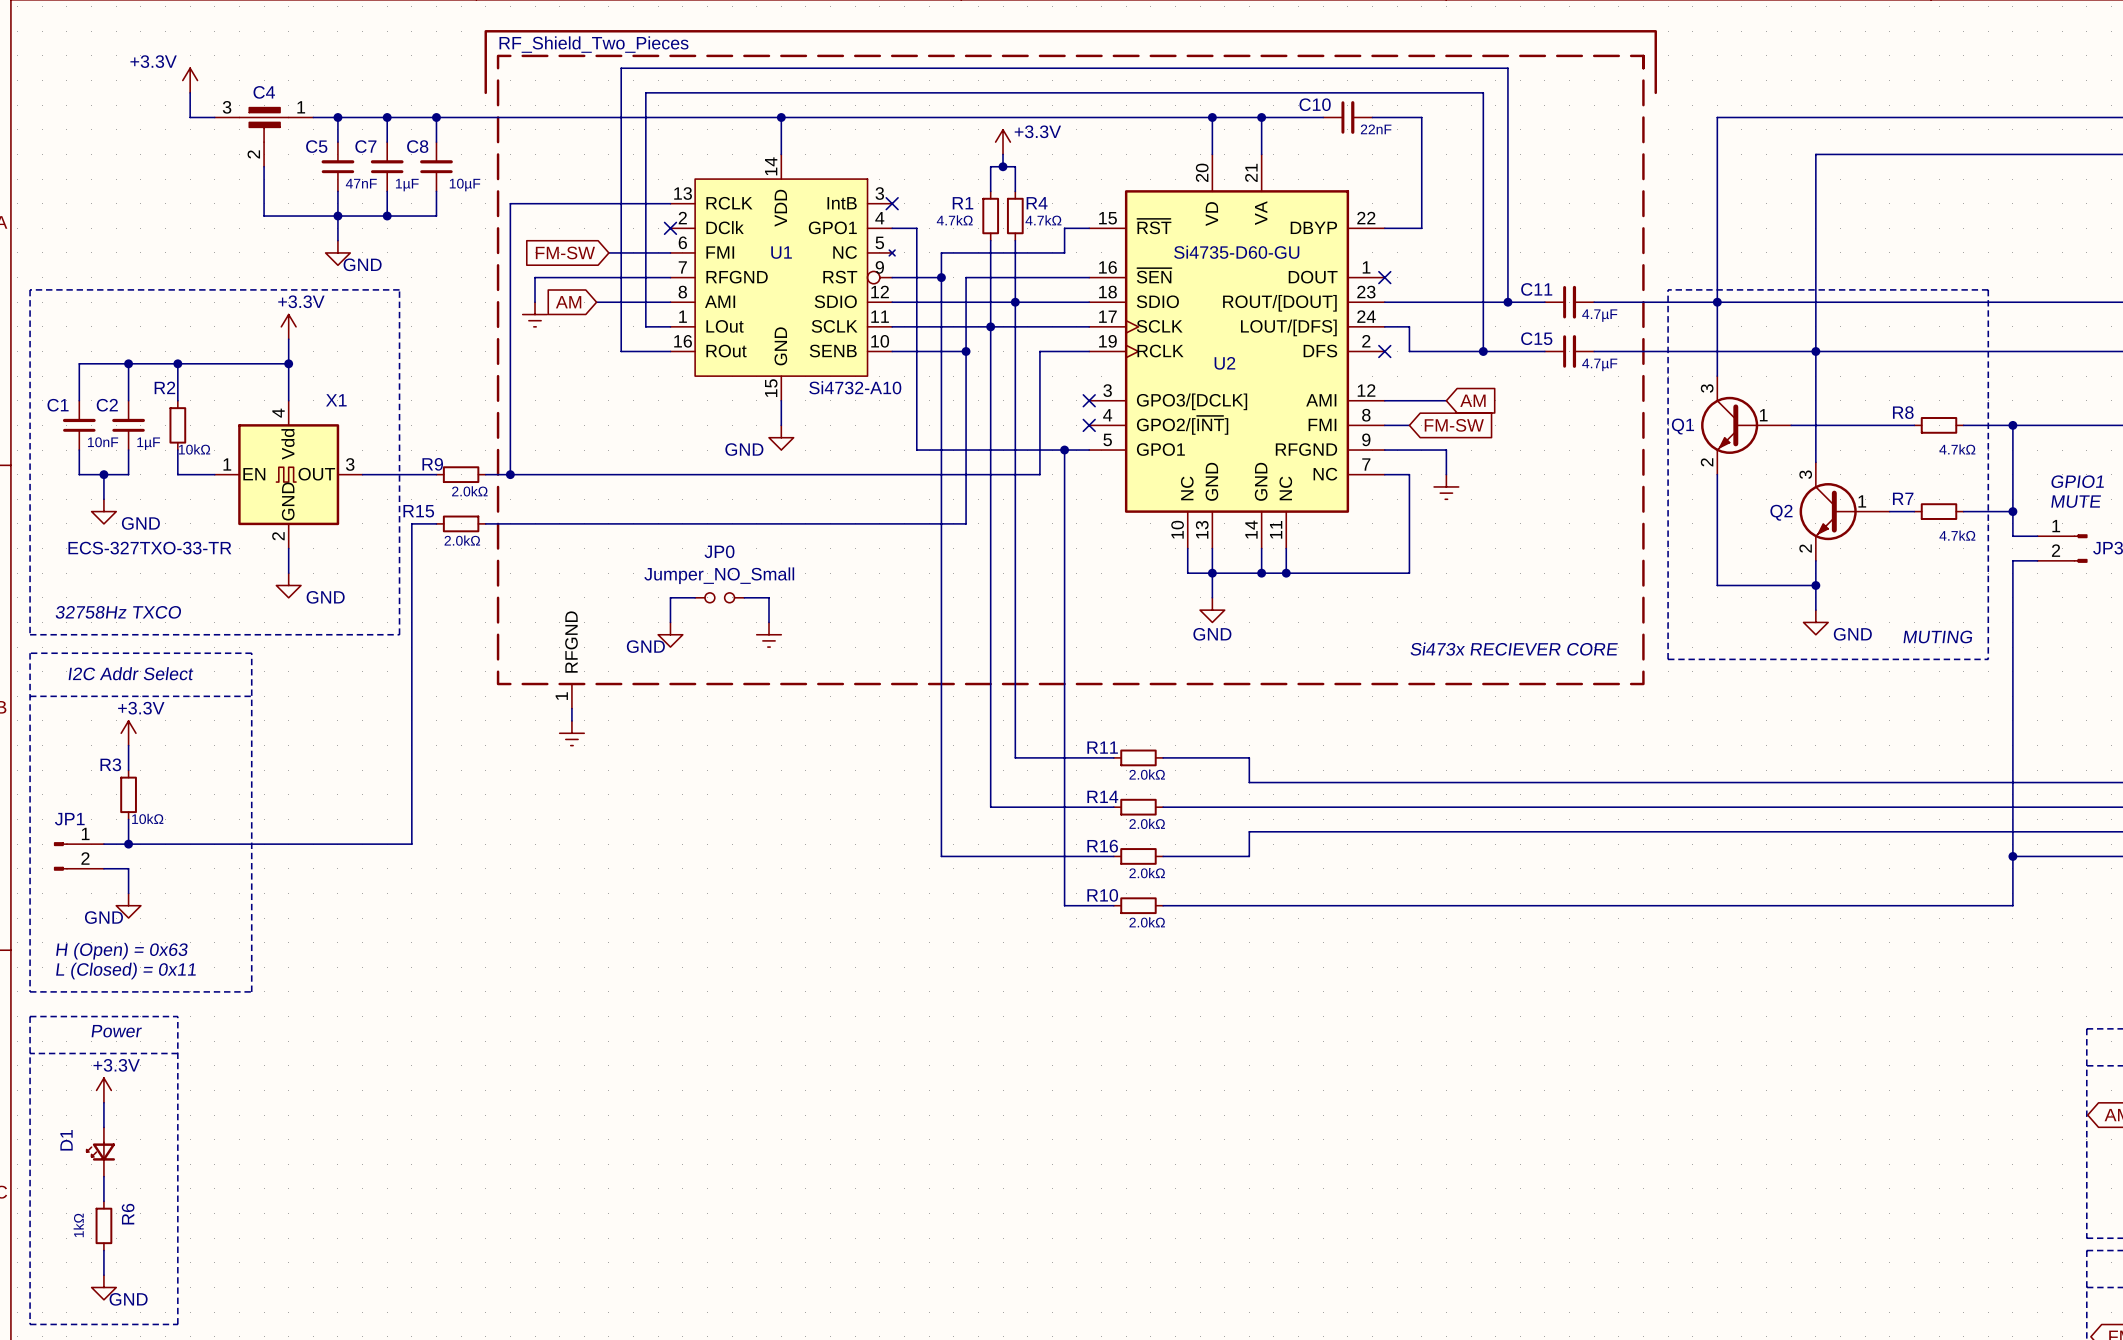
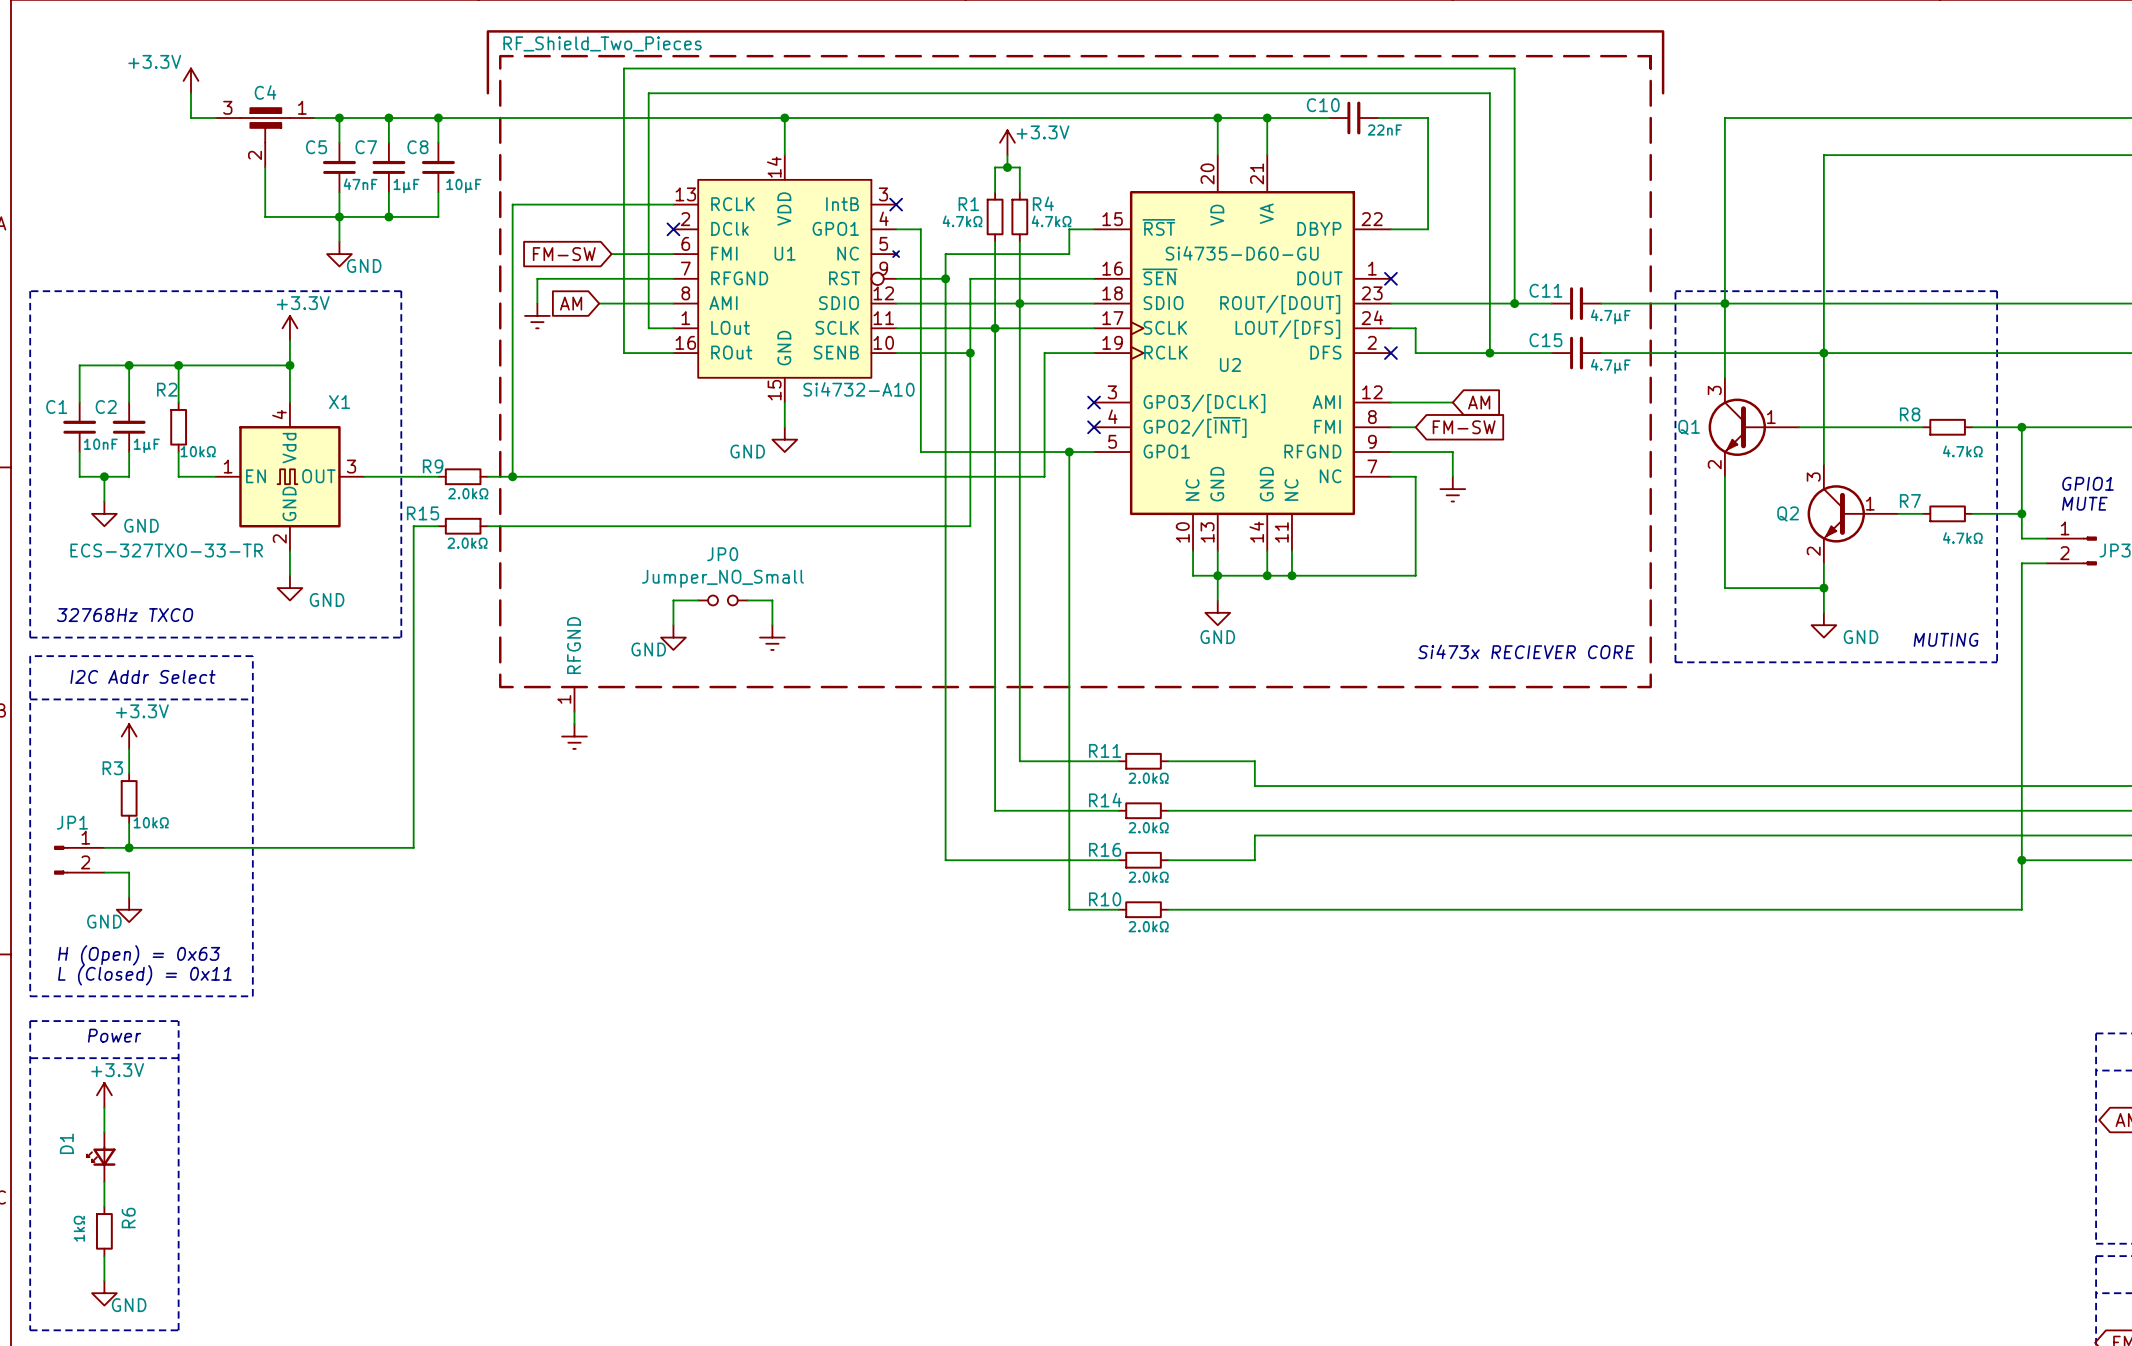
text: 32758Hz TXCO (118, 612) -> 32768Hz TXCO (125, 615)

